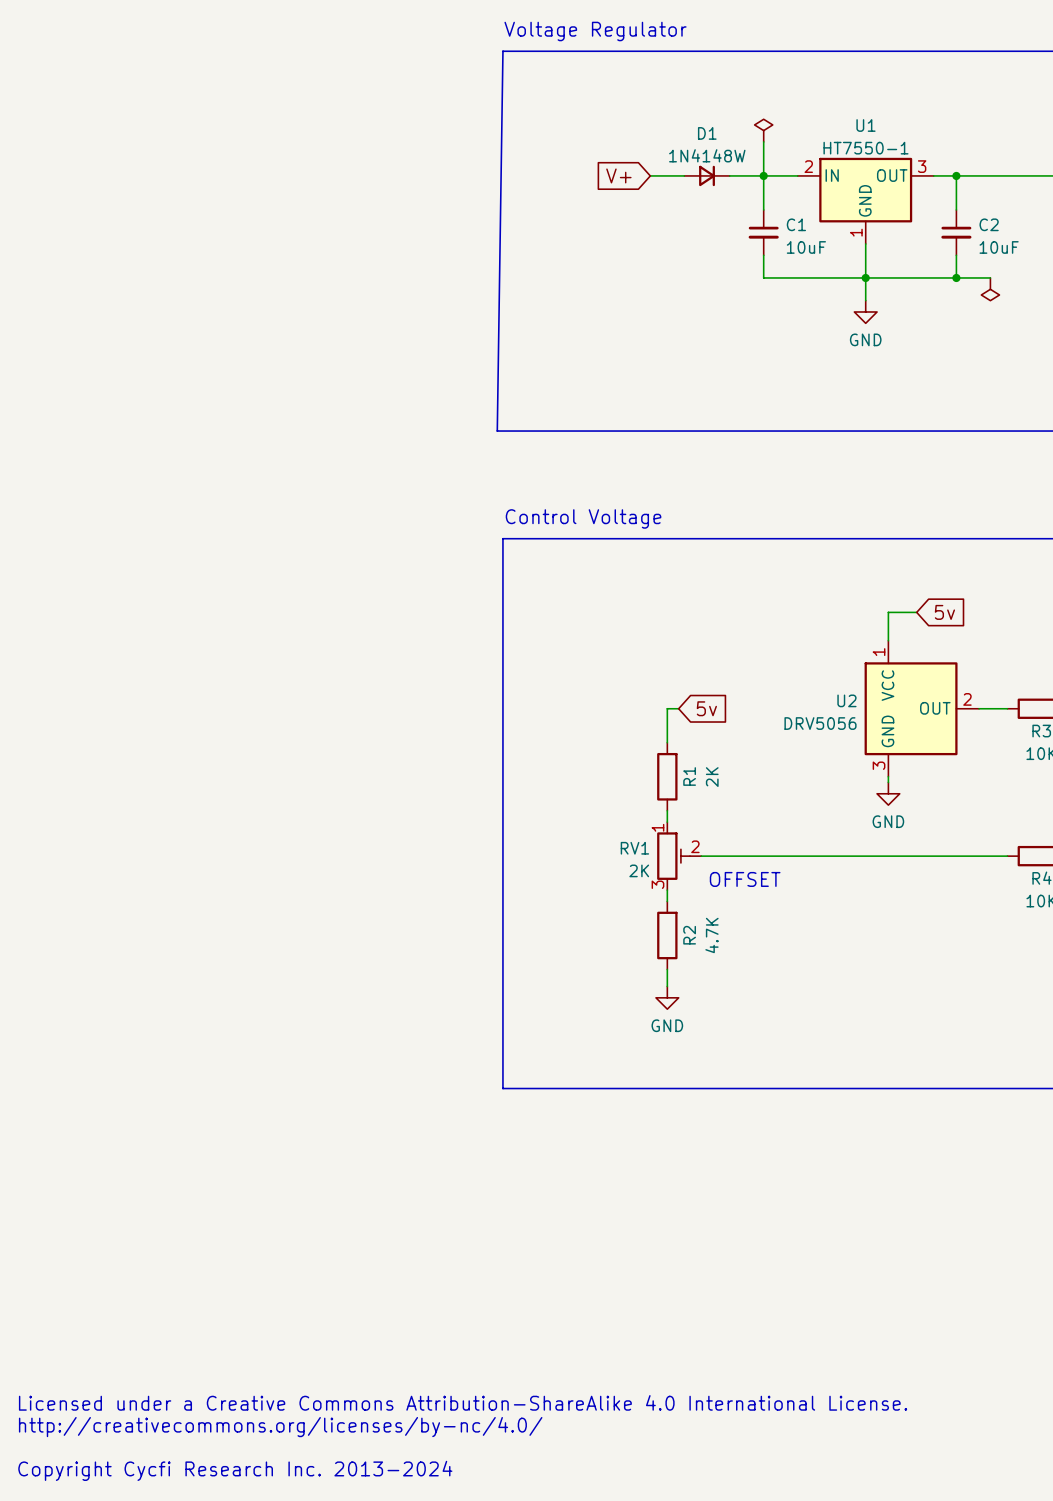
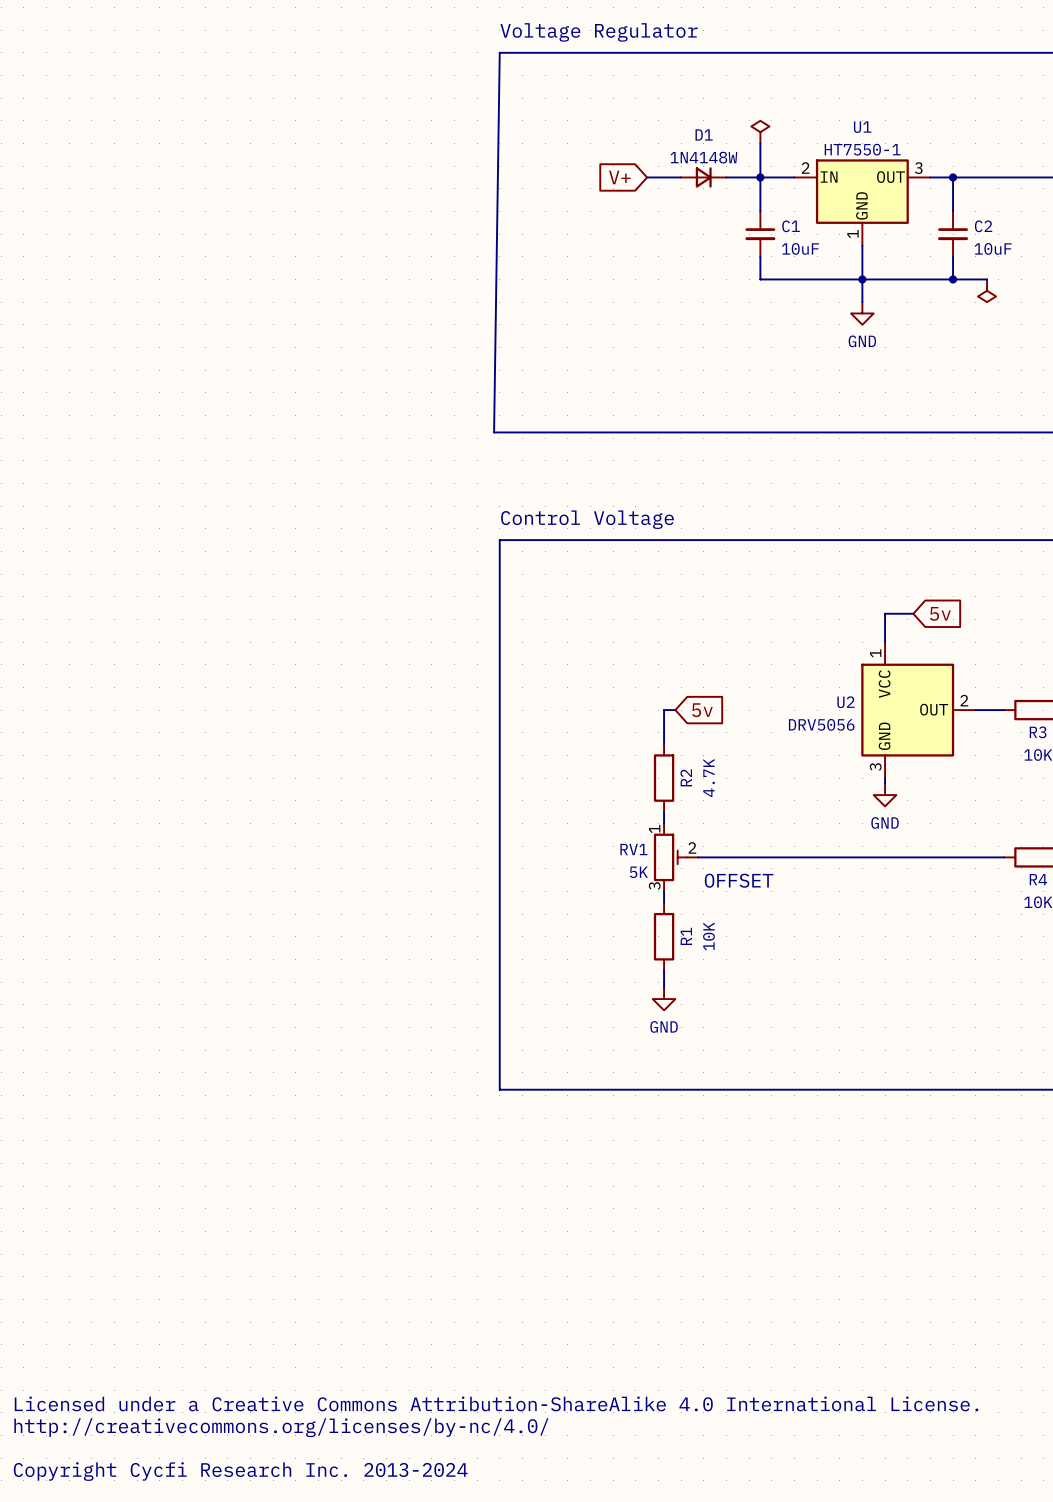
R1 name: R1 (689, 776) -> R2 (686, 777)
R1 value: 2K (712, 777) -> 4.7K (709, 777)
RV1 value: 2K (639, 870) -> 5K (638, 872)
R2 name: R2 (689, 935) -> R1 (686, 936)
R2 value: 4.7K (711, 935) -> 10K (708, 936)

